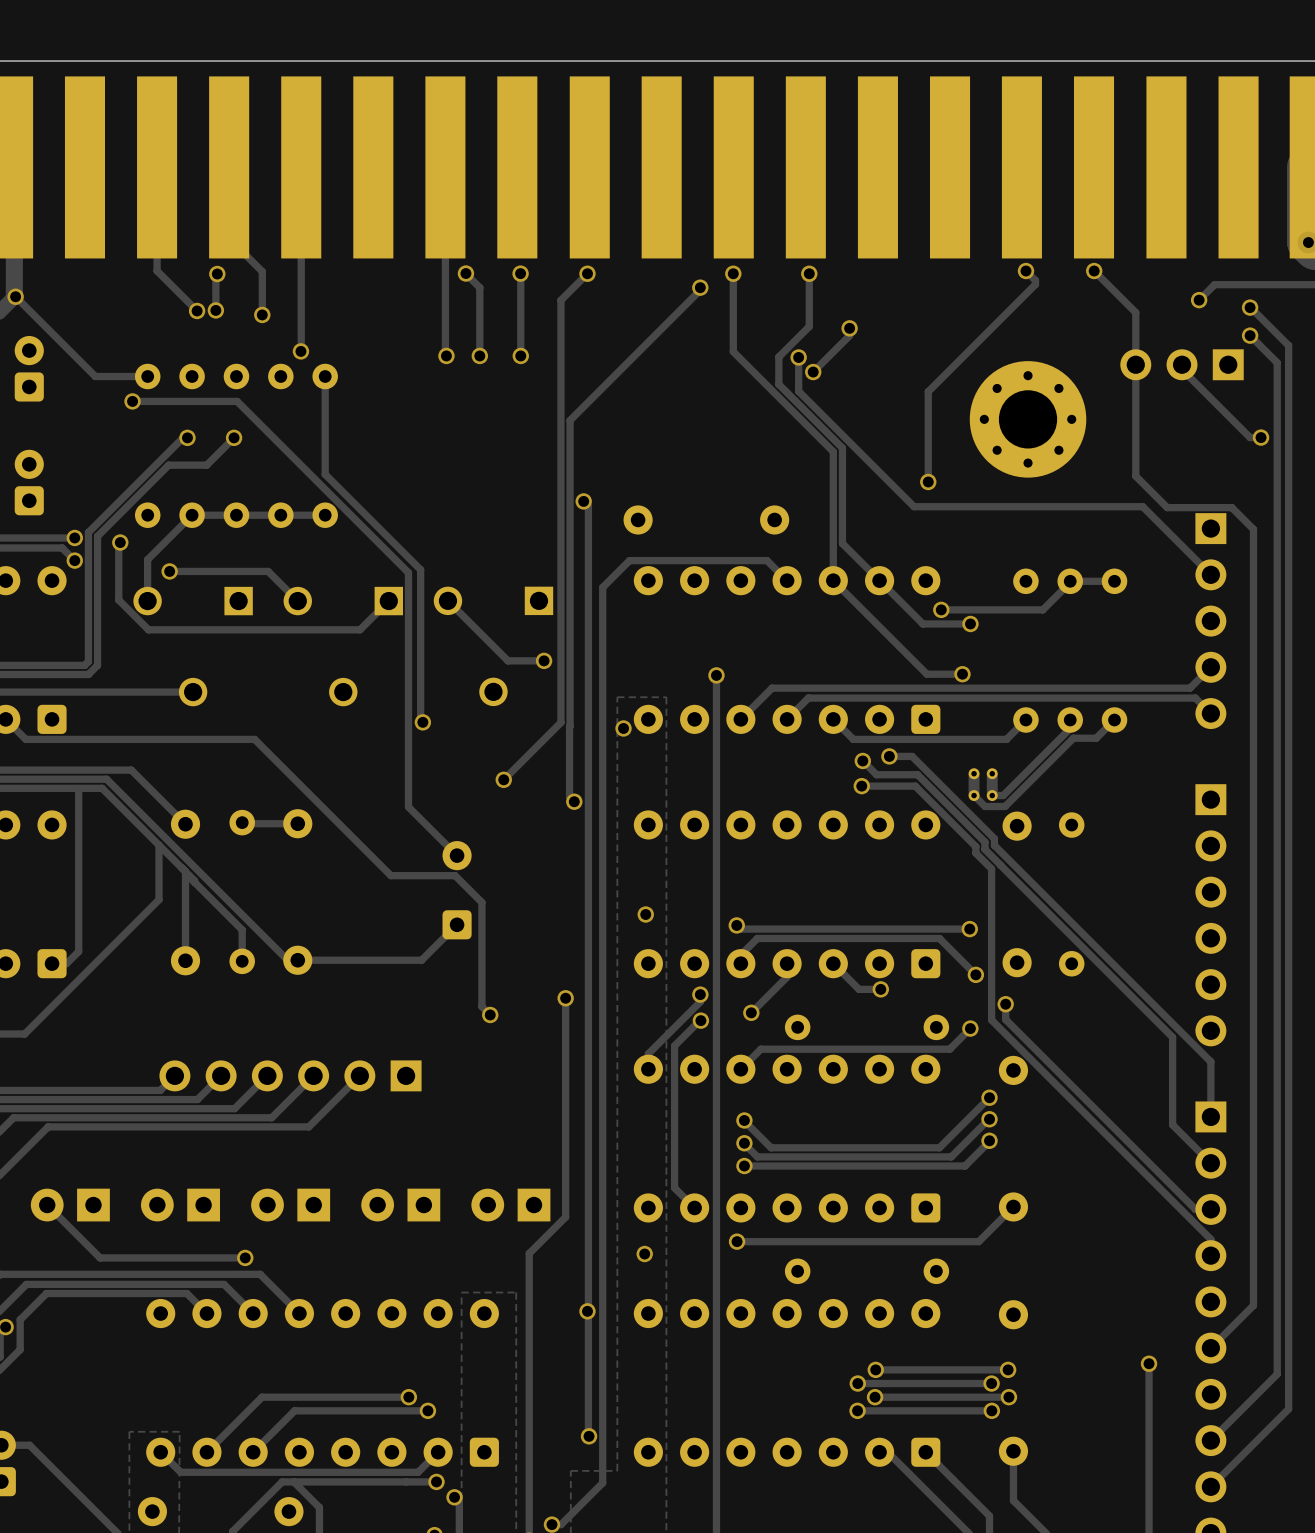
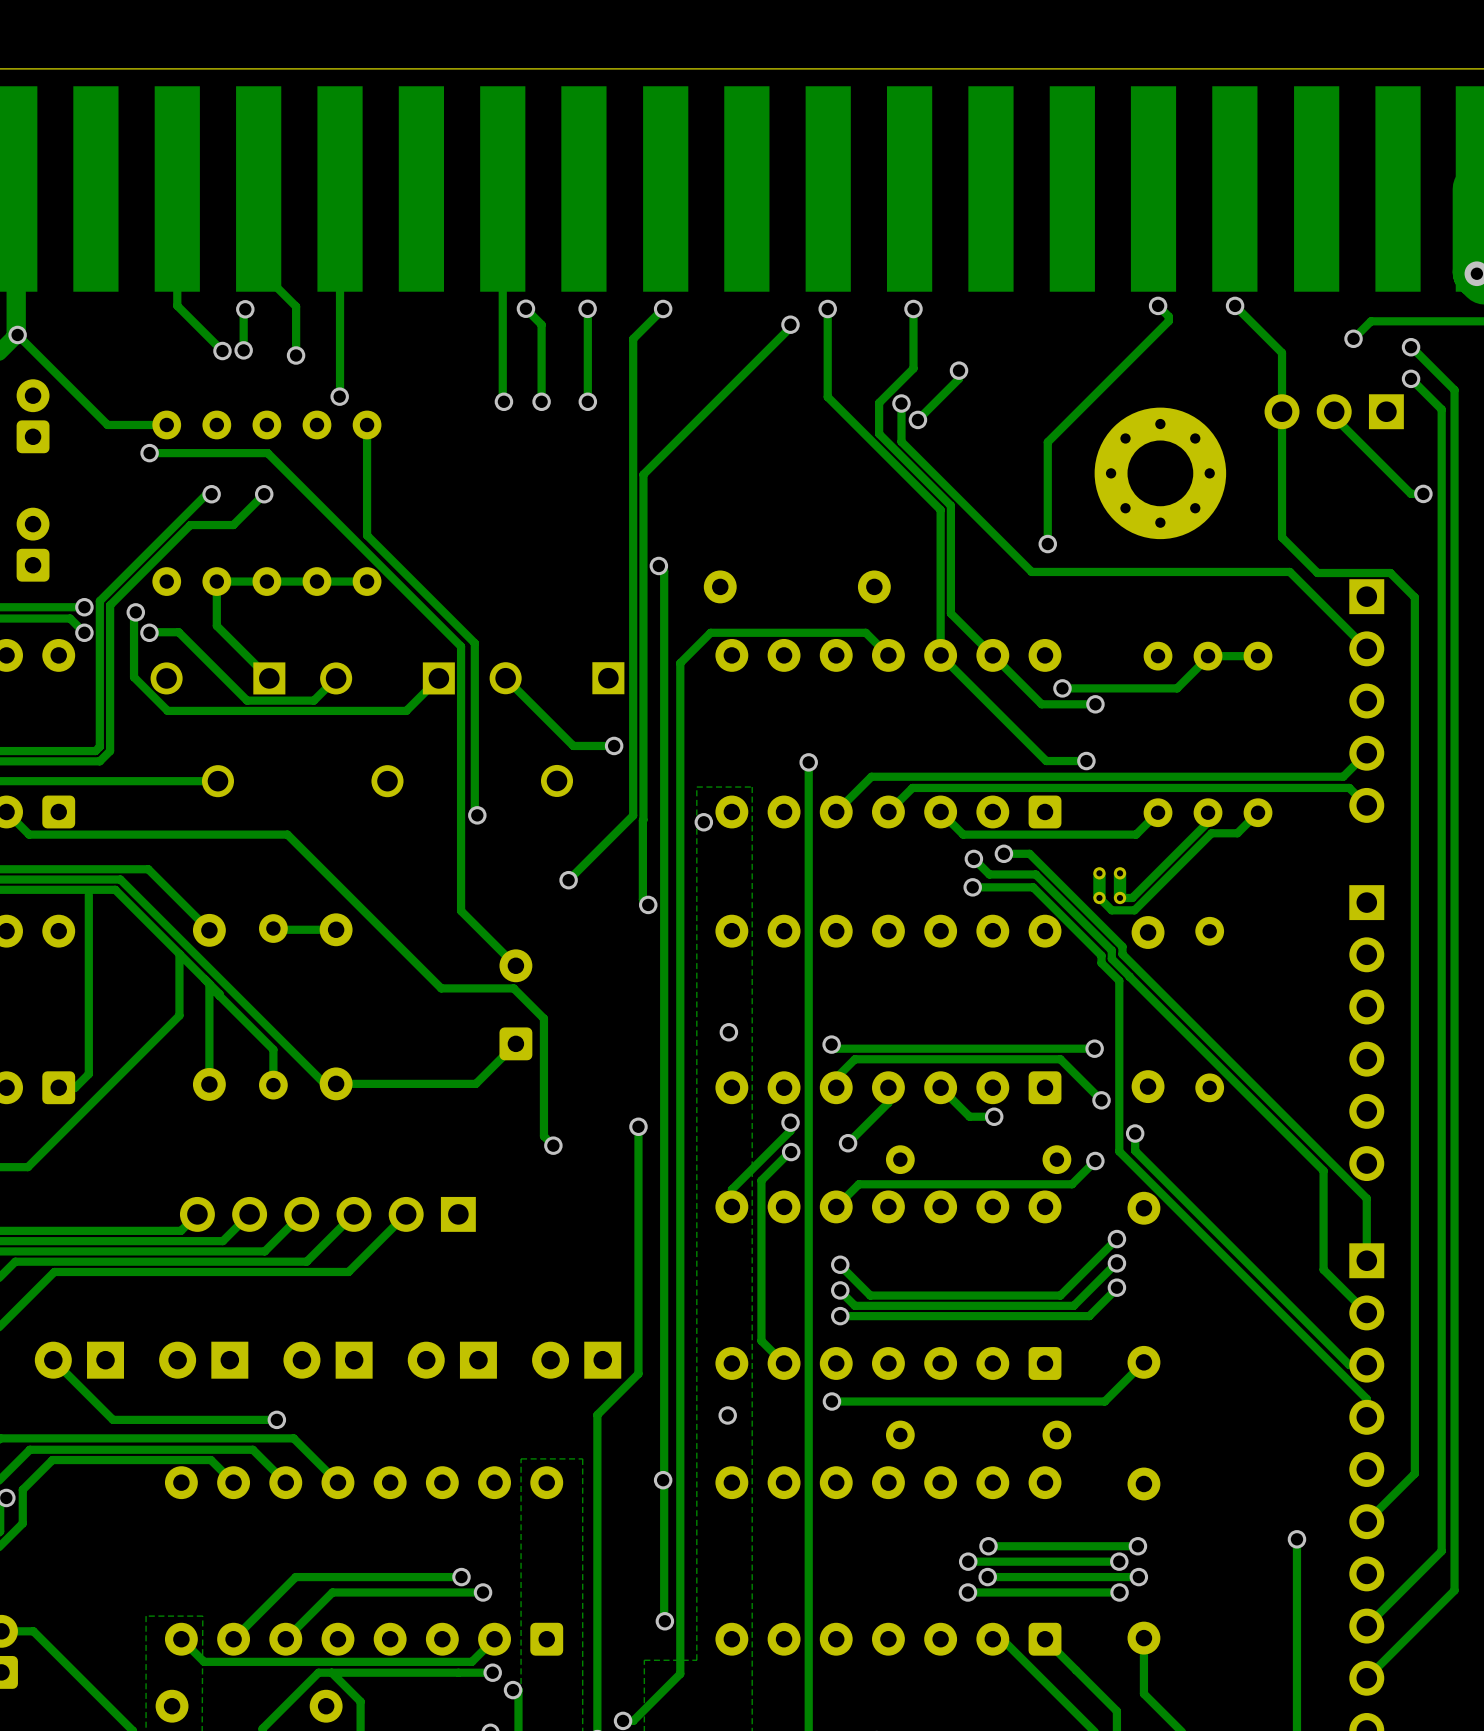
track: (192, 515) (147, 559) (147, 601) -> (216, 581) (216, 625) (269, 678)
track: (169, 571) (268, 571) (297, 601) -> (149, 632) (178, 632) (247, 700) (313, 700) (336, 678)
via position: (169, 571) -> (149, 632)

